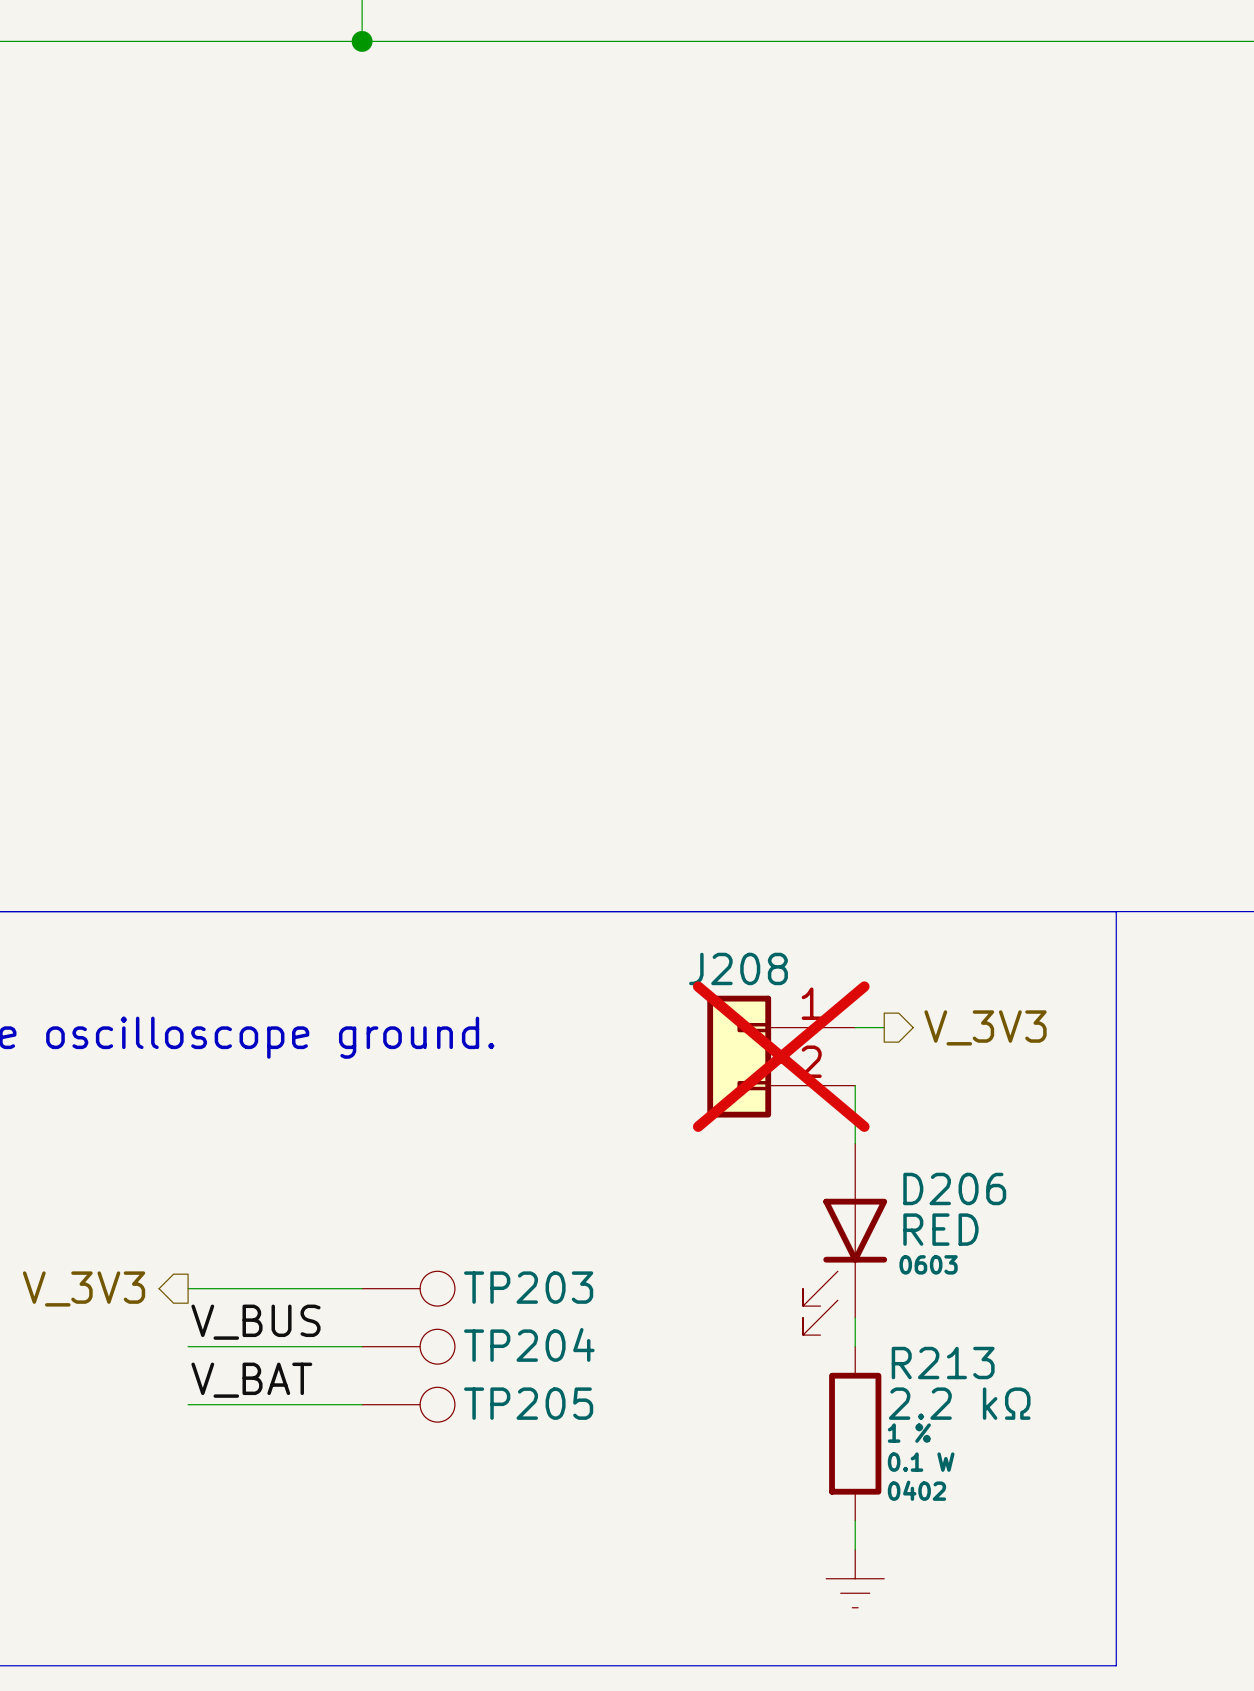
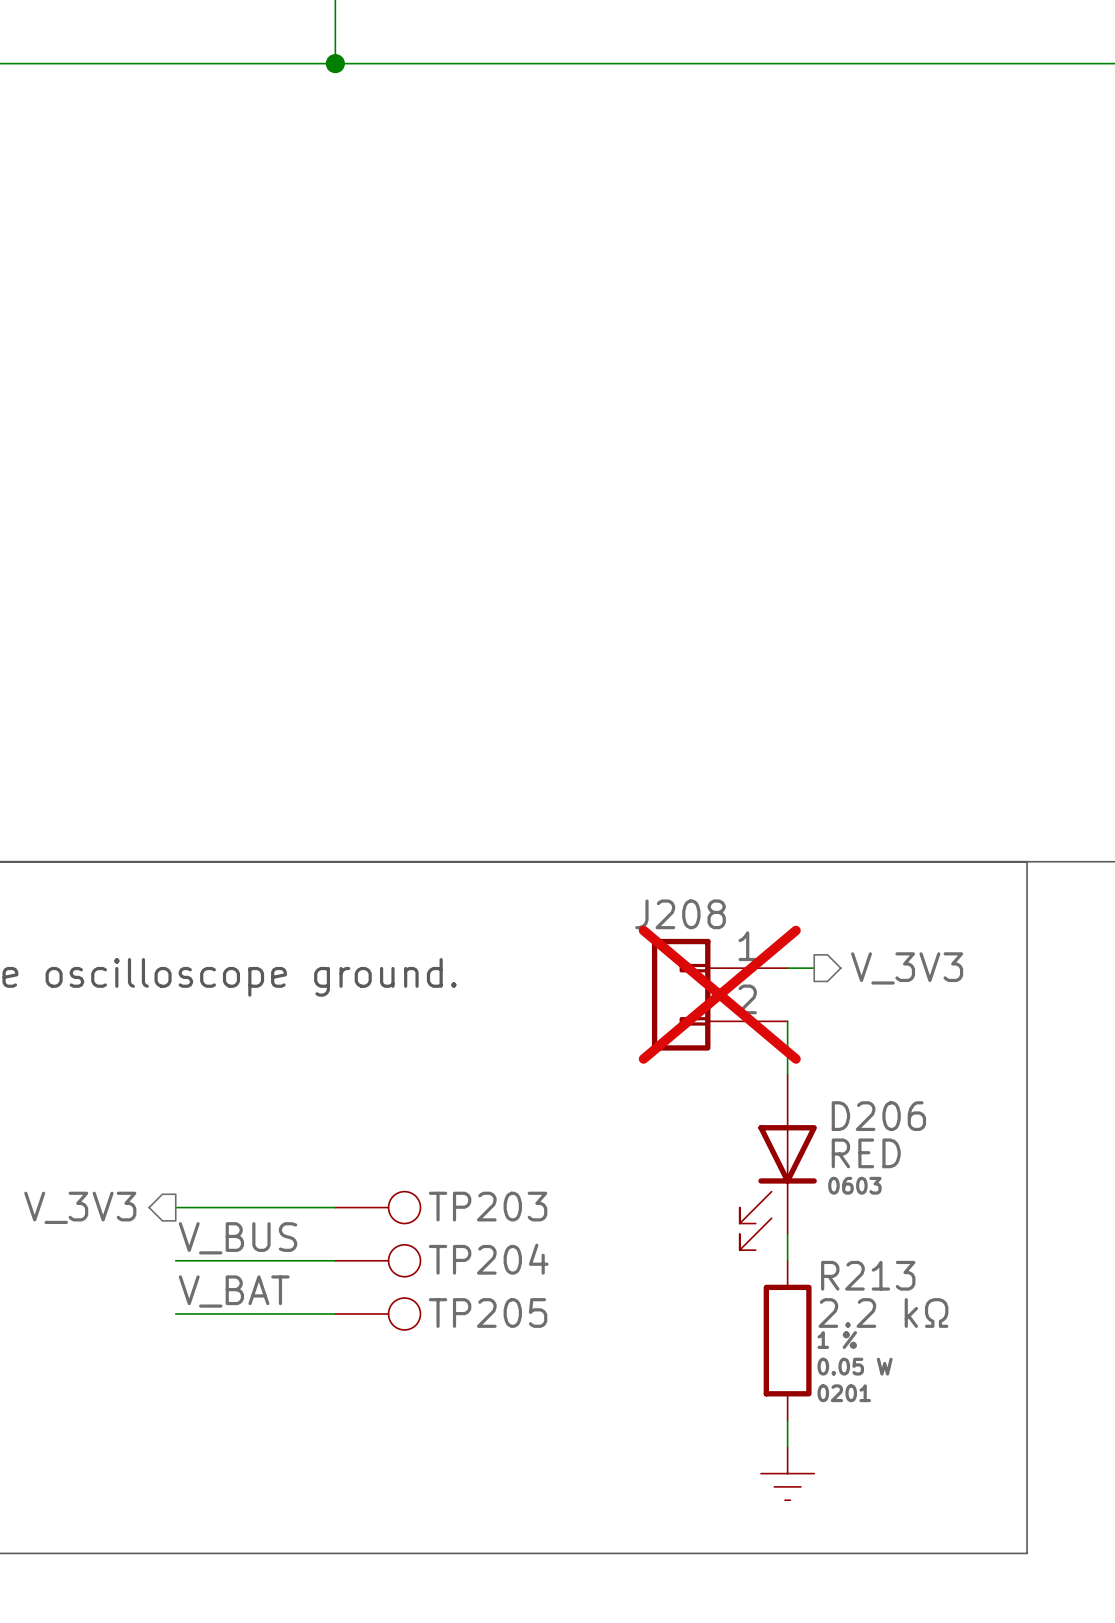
R213 text: 0.1 W (921, 1462) -> 0.05 W (855, 1366)
R213 text: 0402 (916, 1490) -> 0201 (844, 1393)

